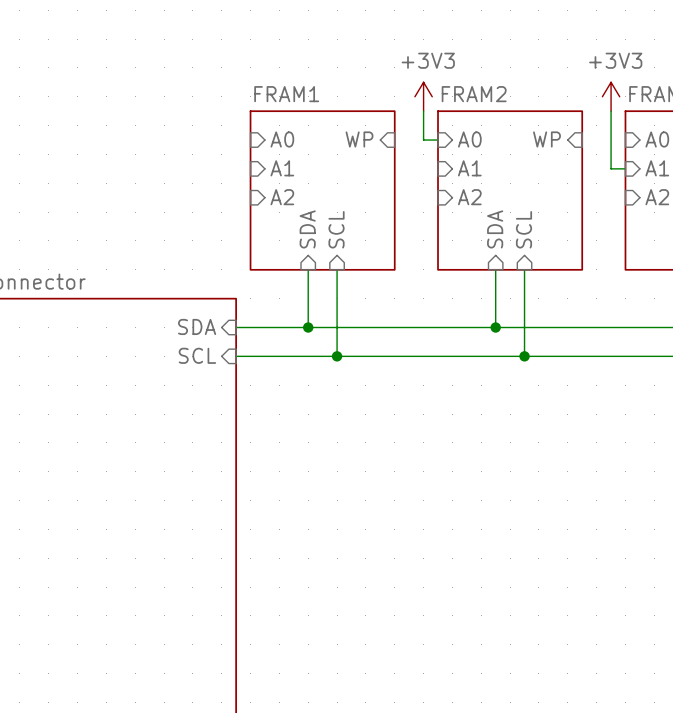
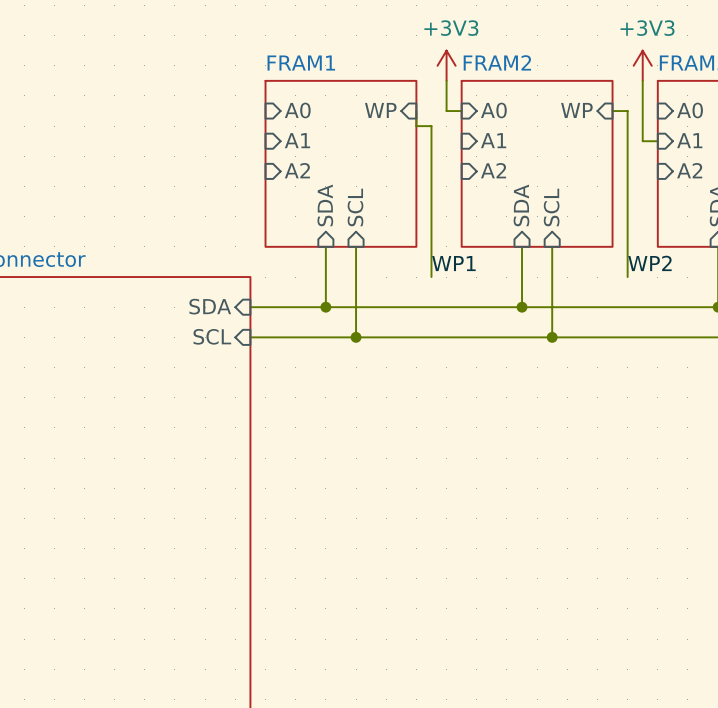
wire: none -> (416, 111) (416, 126) (431, 126) (431, 277)
wire: none -> (612, 111) (627, 111) (627, 277)
label: none -> WP1 (453, 263)
label: none -> WP2 (650, 263)

